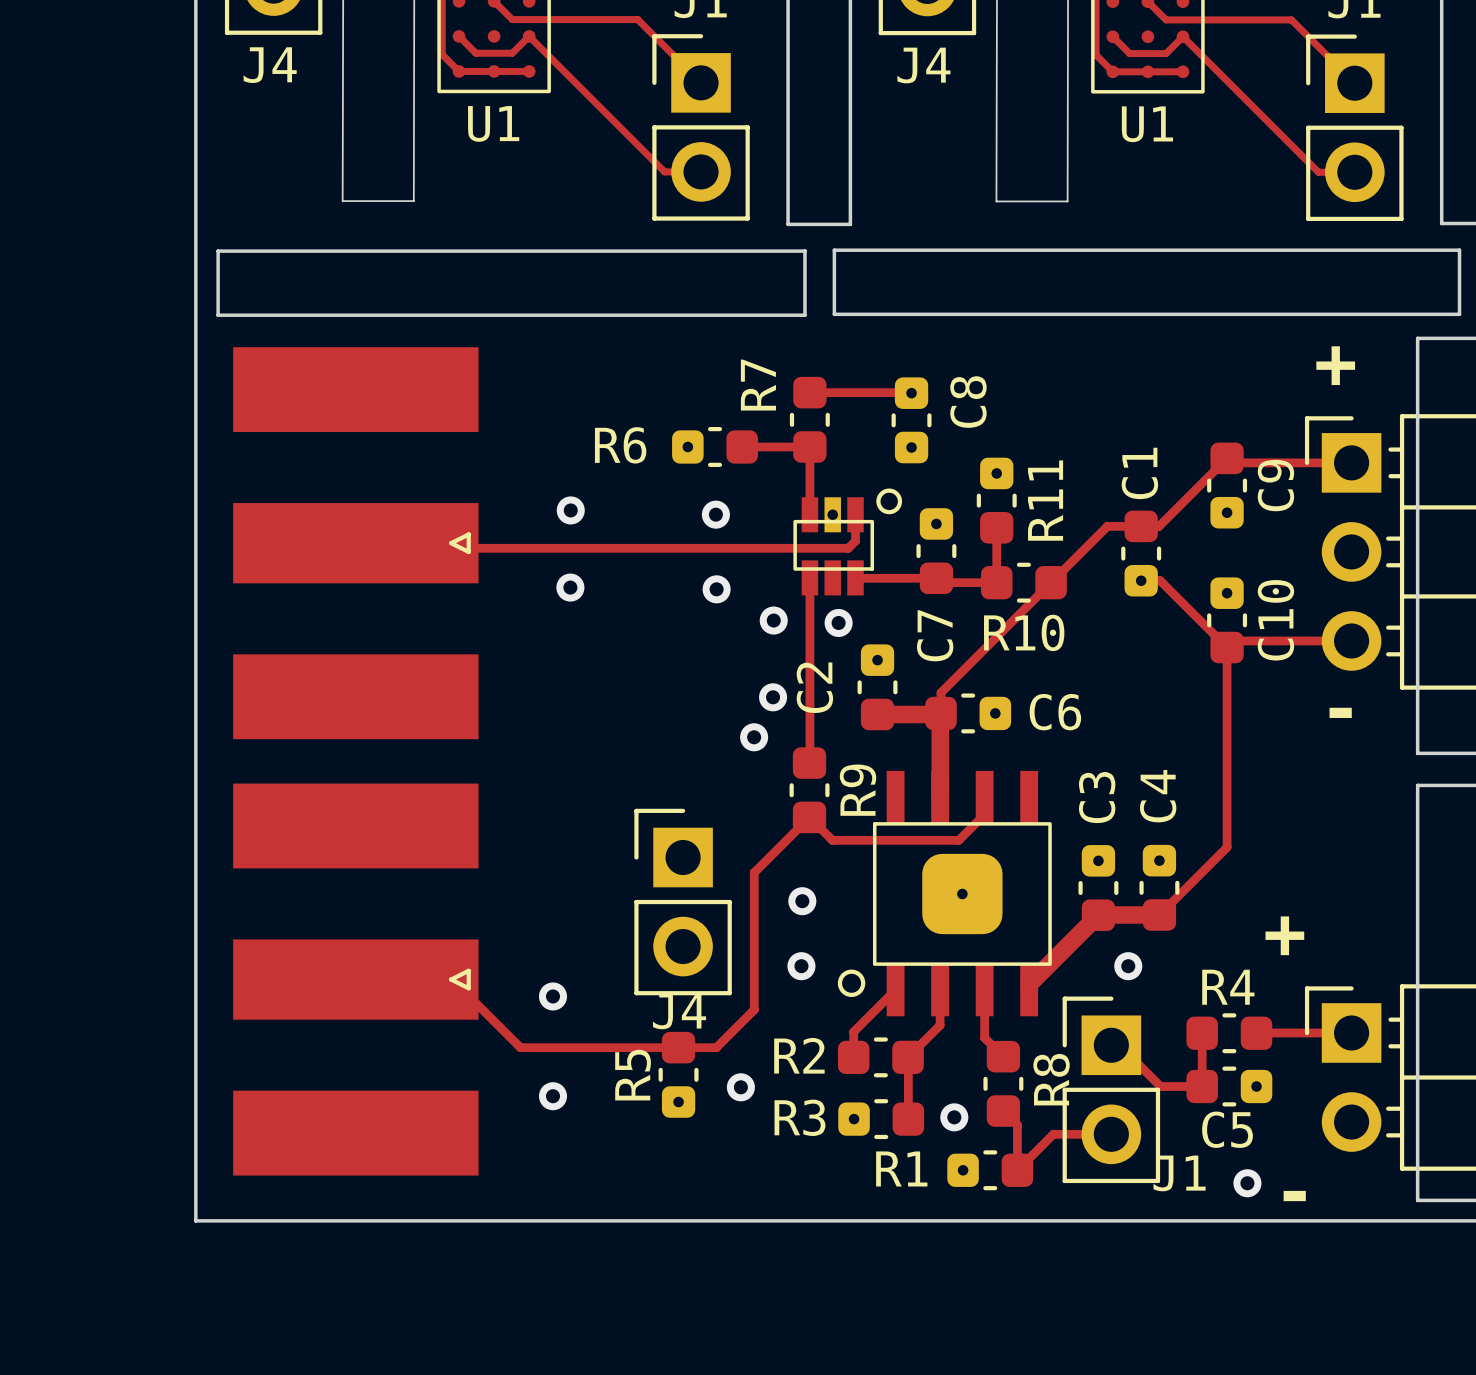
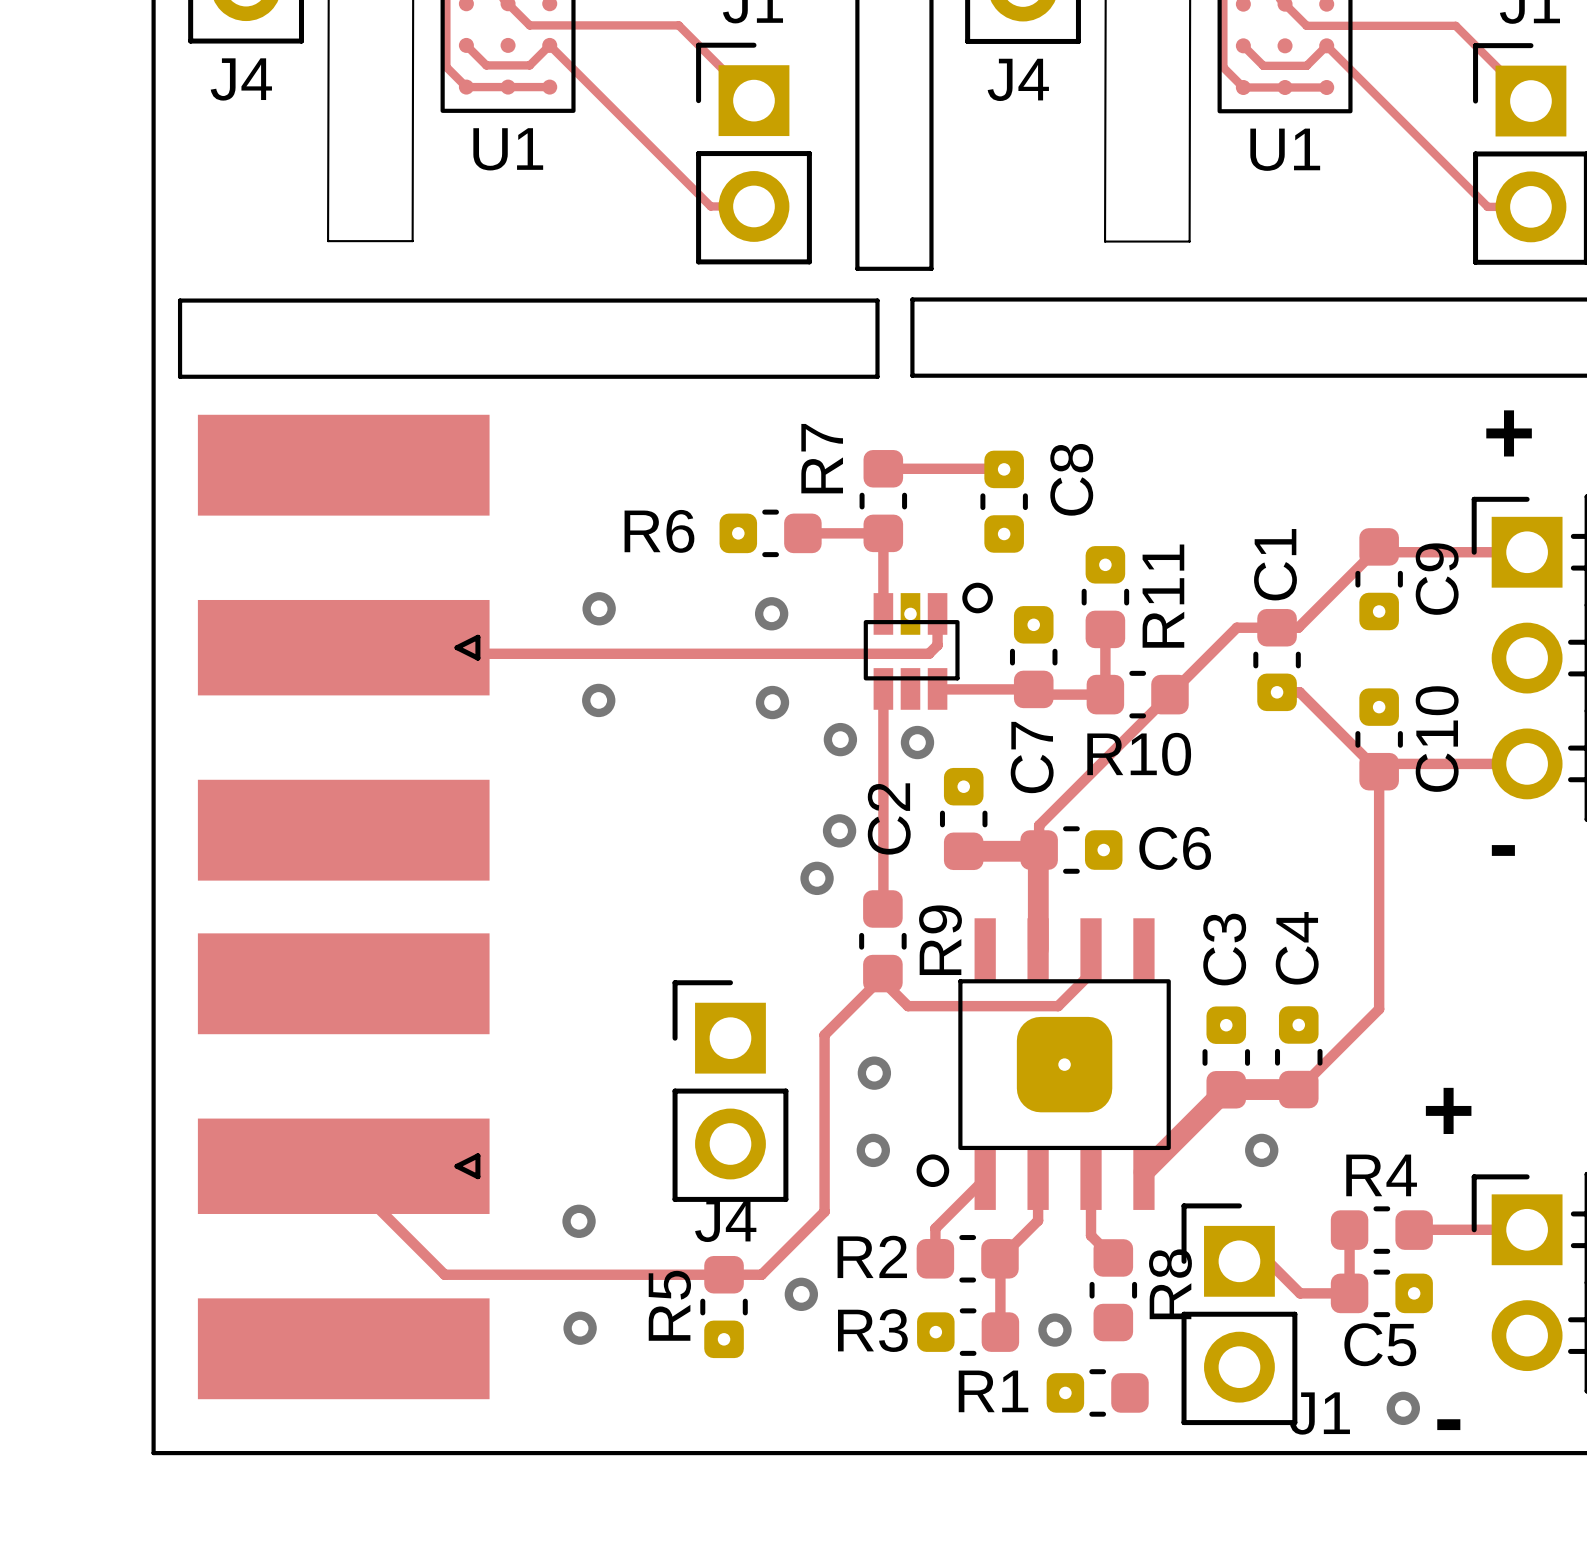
track: (984, 797) (984, 814) (958, 840) (832, 840) (809, 817) (754, 872) (754, 1009) (716, 1047) (520, 1047) (452, 979) -> none
track: none -> (1088, 954) (1088, 975) (1058, 1006) (908, 1006) (880, 978) (824, 1035) (824, 1211) (761, 1274) (444, 1274) (341, 1171) (473, 1171)
J4 position: (683, 902) -> (730, 1091)
via position: (552, 996) -> (579, 1221)
R5 position: (678, 1074) -> (724, 1307)
J1 position: (1111, 1089) -> (1239, 1314)
via position: (552, 1096) -> (580, 1328)
track: (1003, 1111) (1017, 1125) (1017, 1170) (1053, 1134) (1111, 1134) -> none

